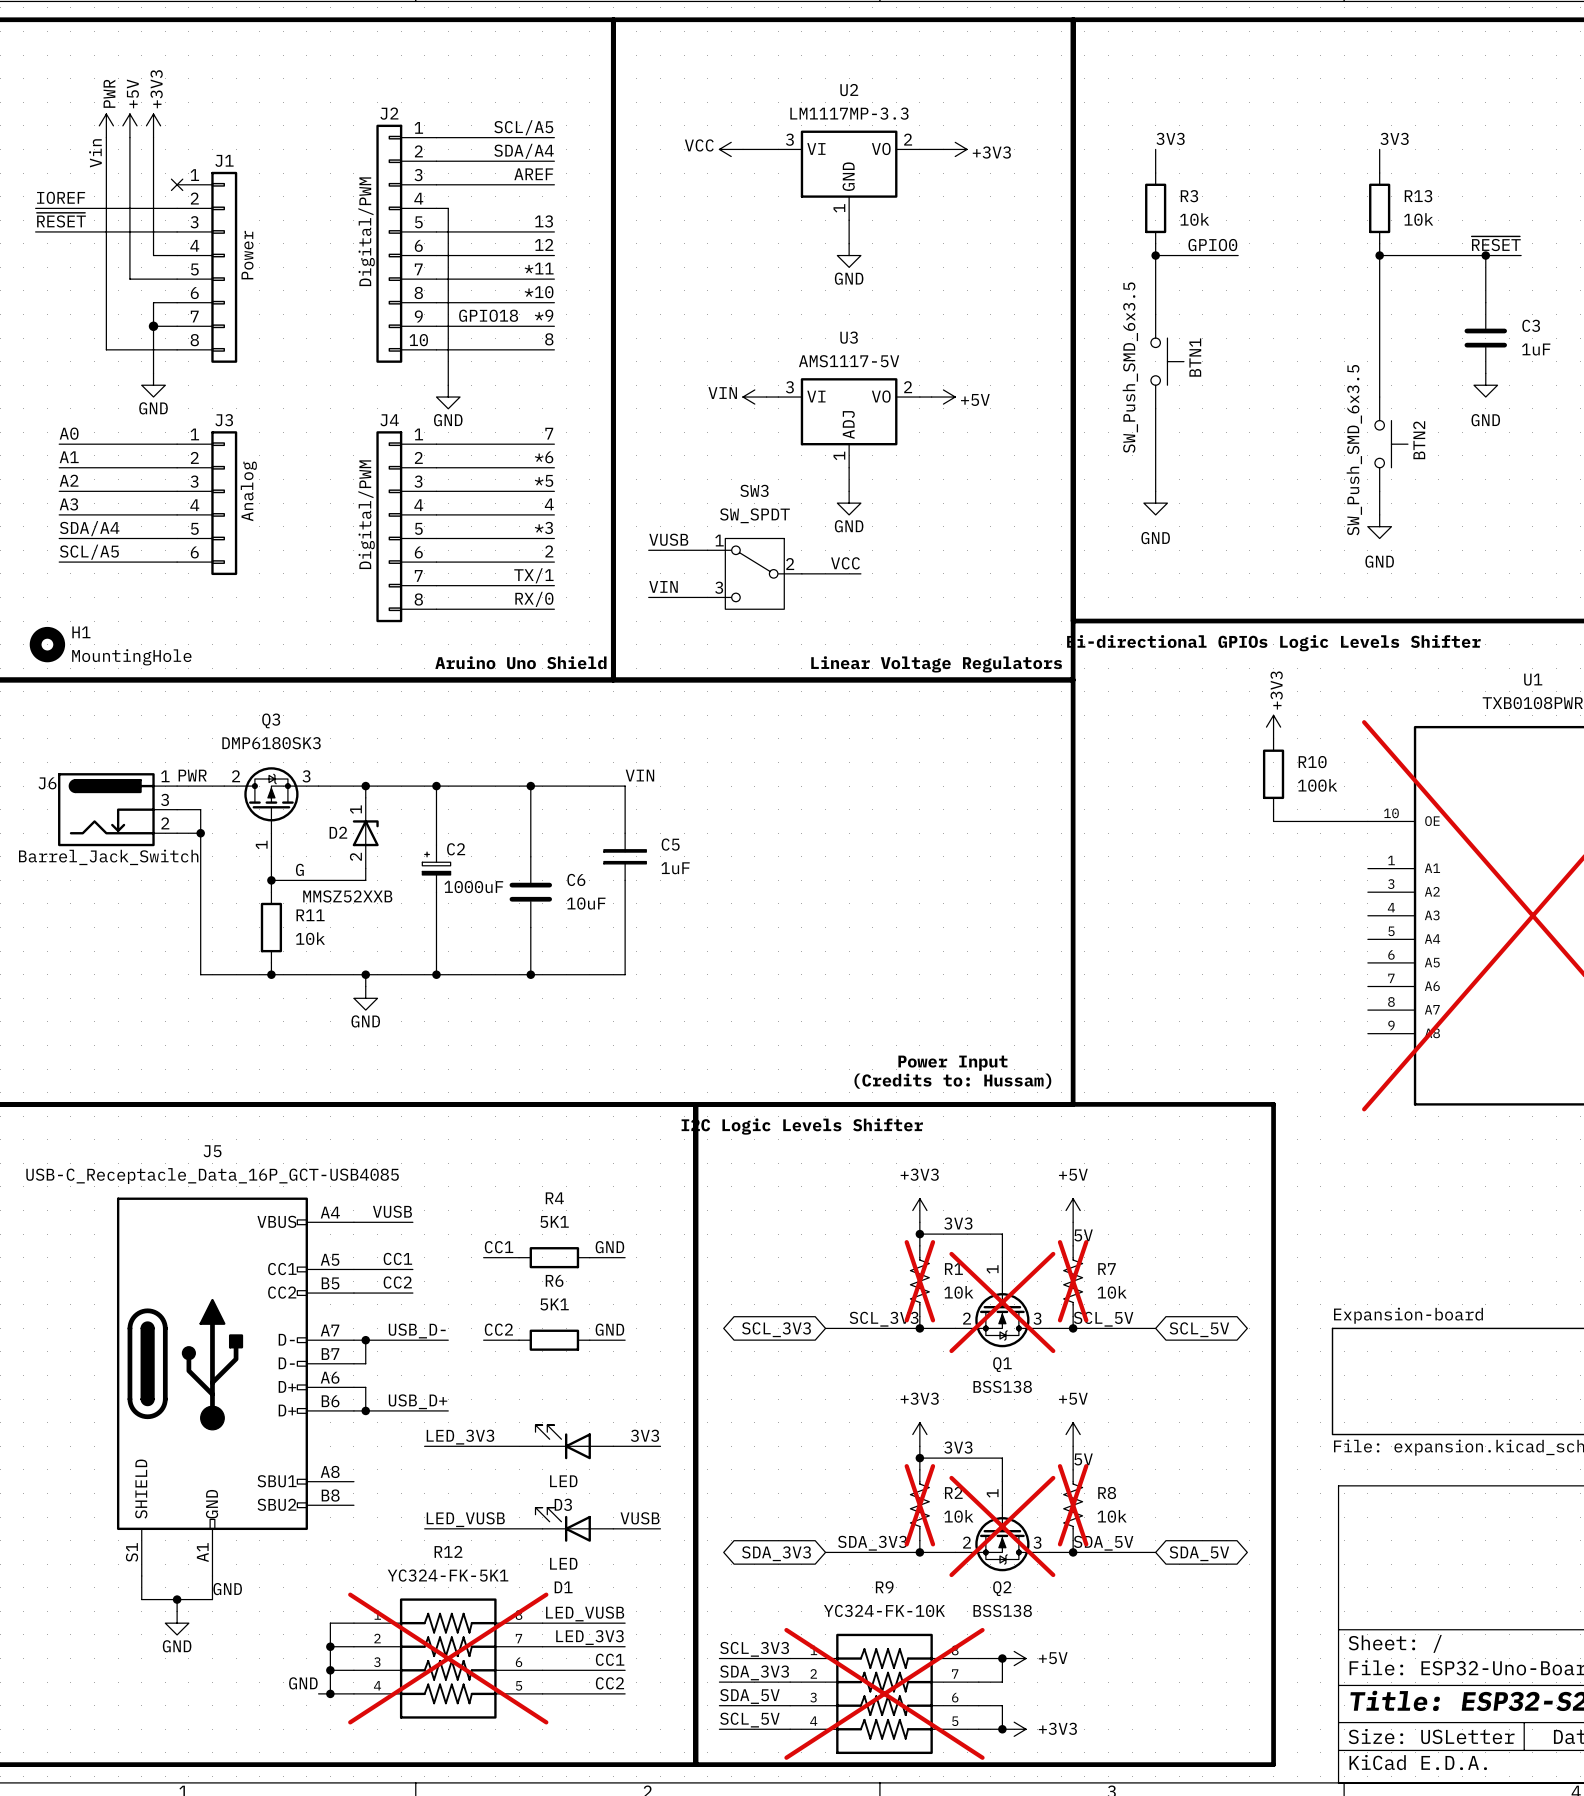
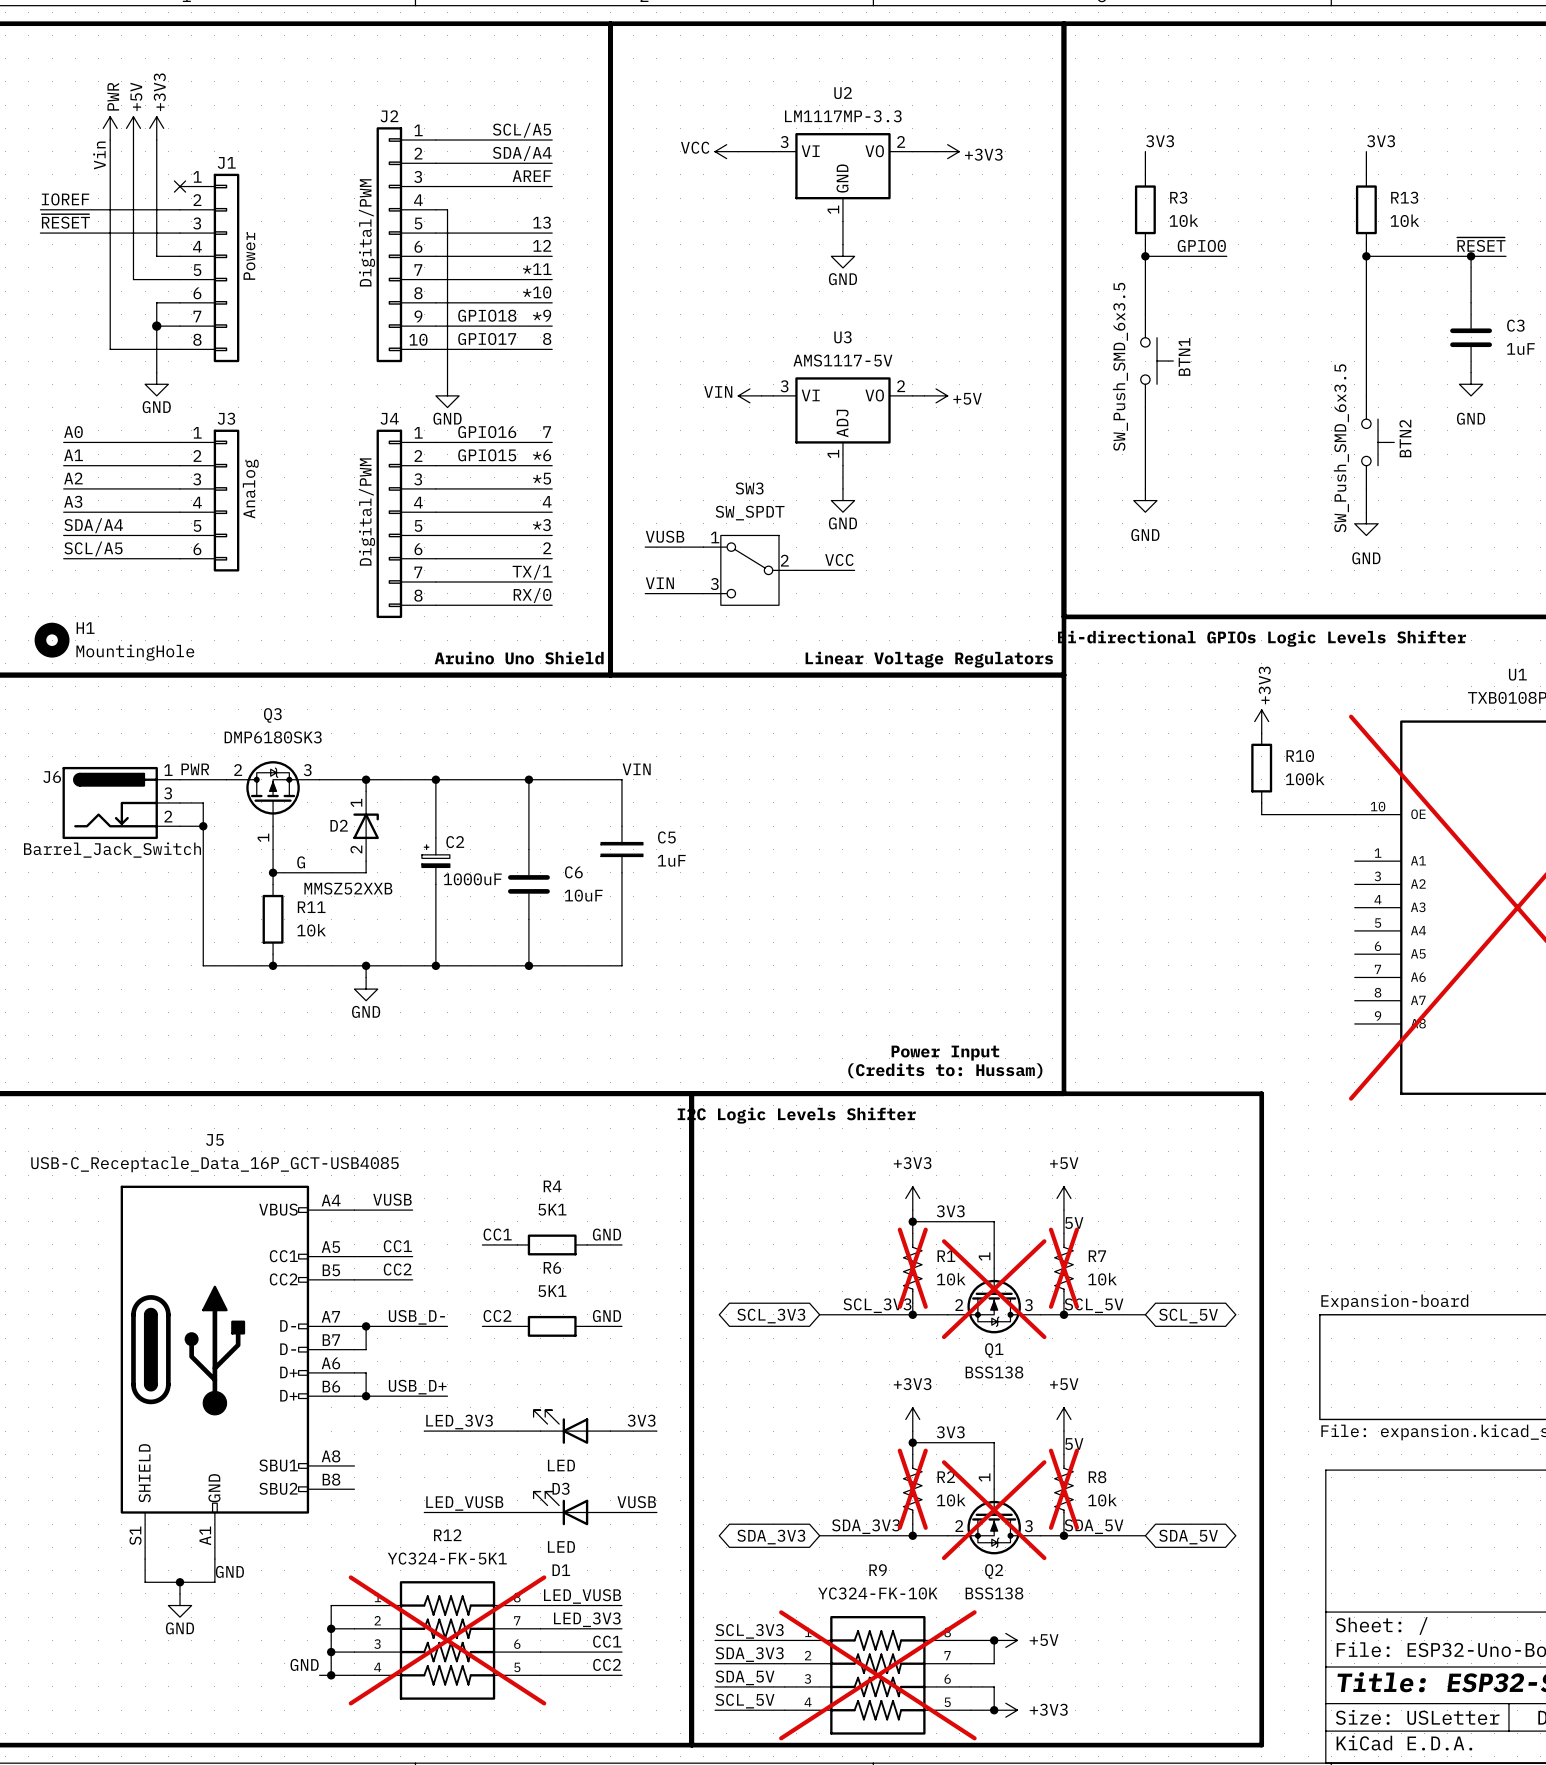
label: none -> GPIO17 (487, 338)
label: none -> GPIO16 (487, 432)
label: none -> GPIO15 (487, 455)

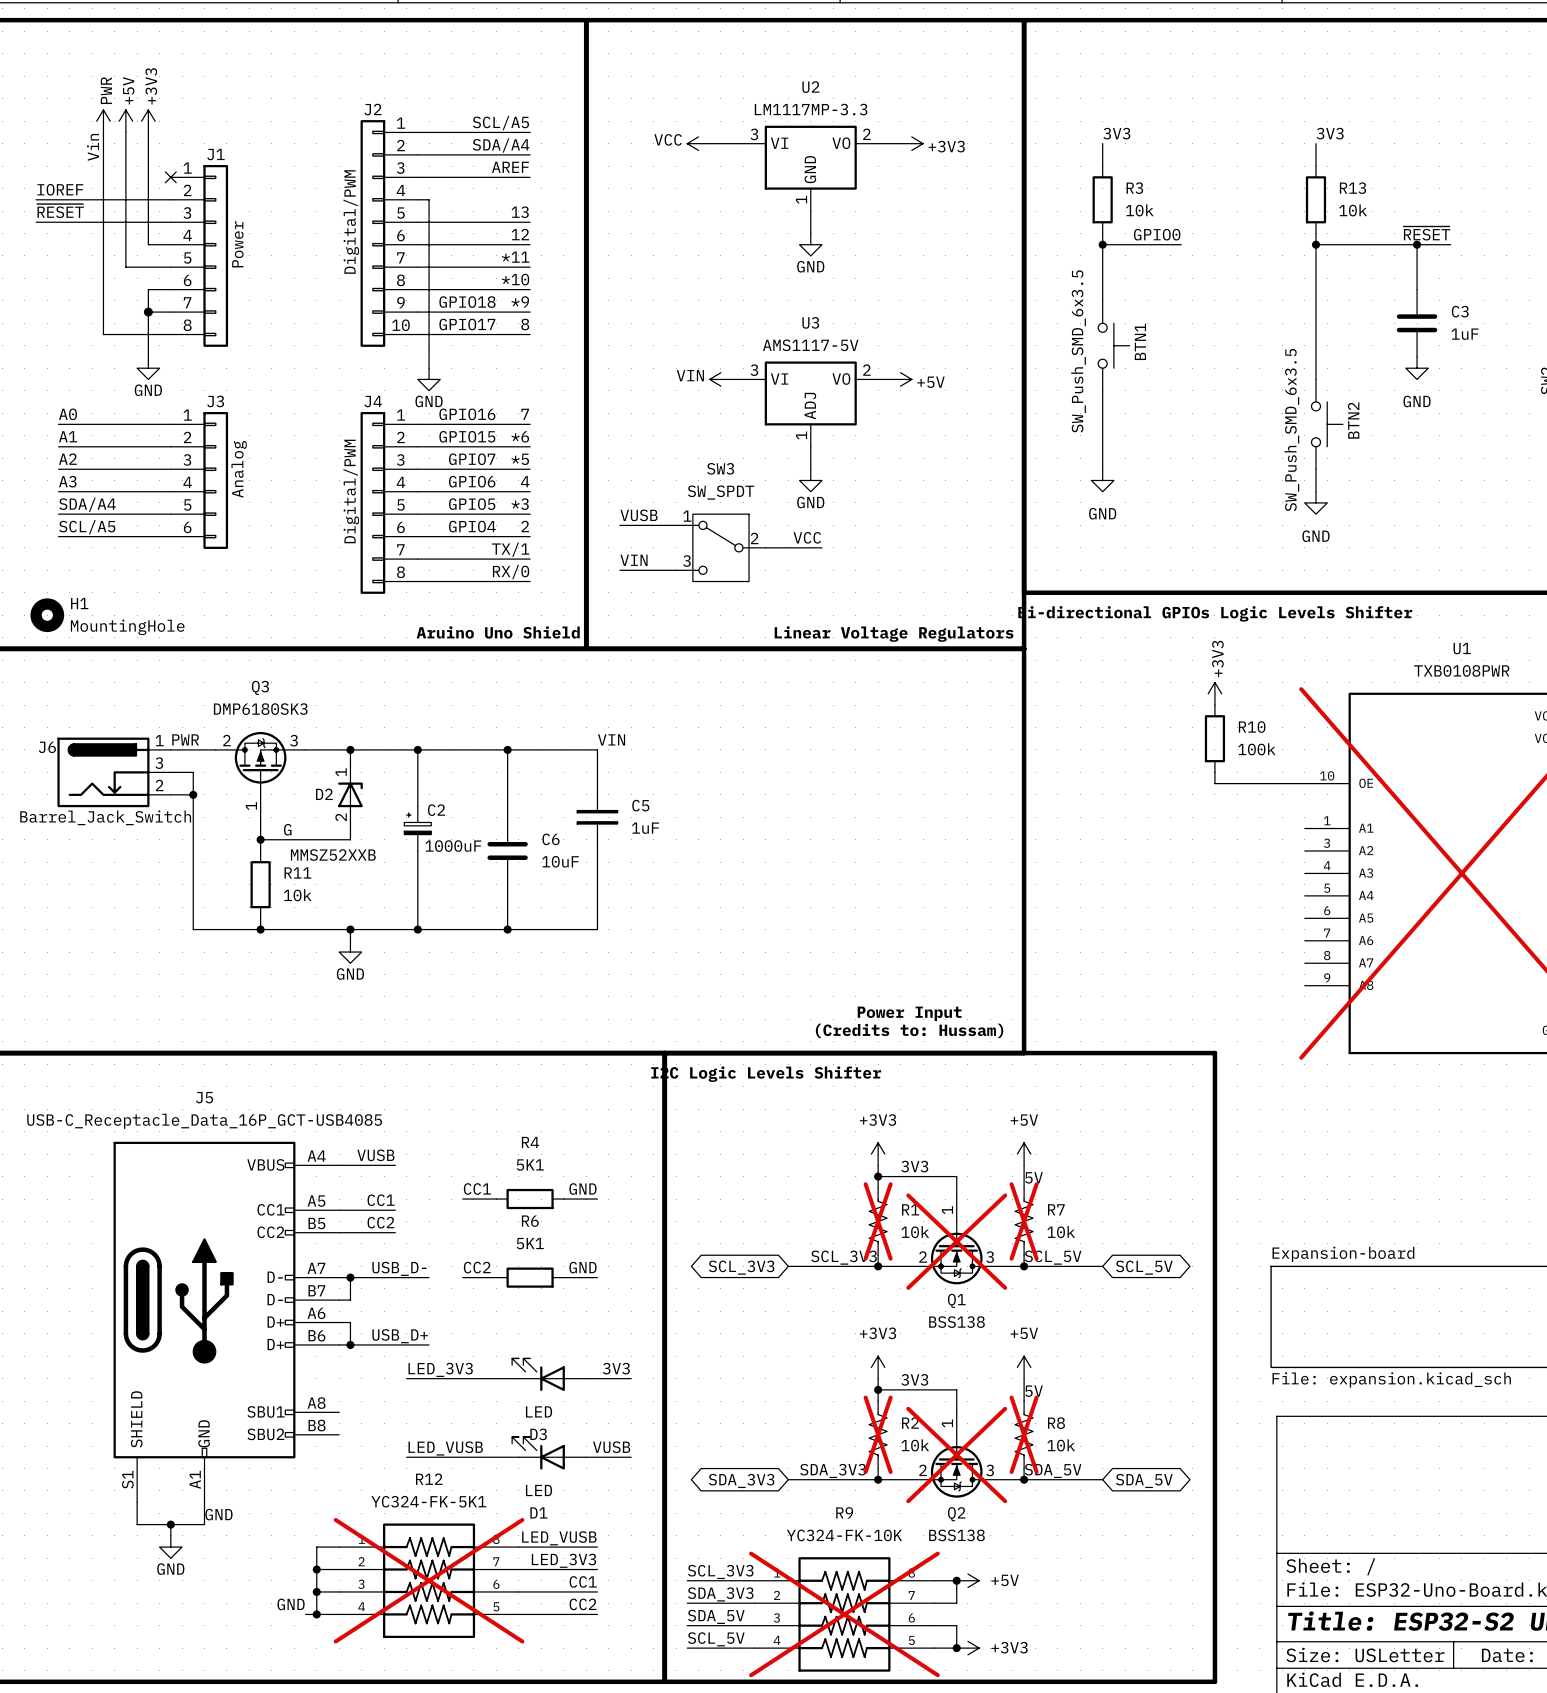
label: none -> GPIO7 (472, 459)
label: none -> GPIO6 (472, 481)
label: none -> GPIO5 (472, 504)
label: none -> GPIO4 (472, 526)

